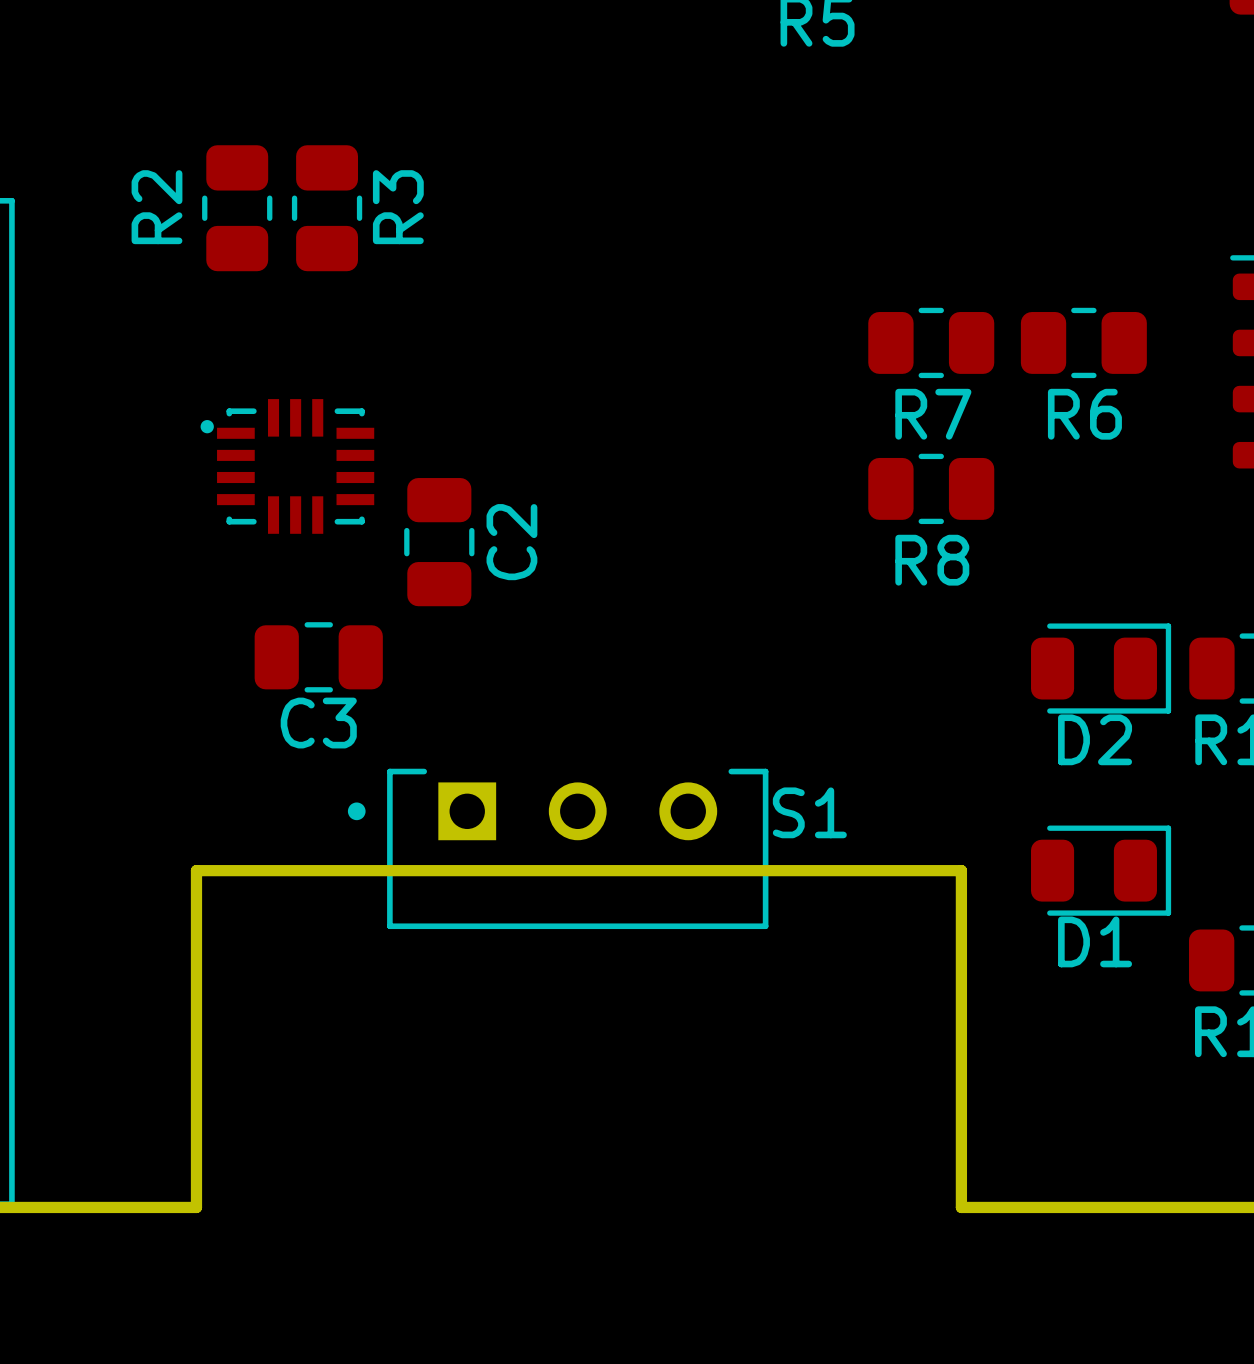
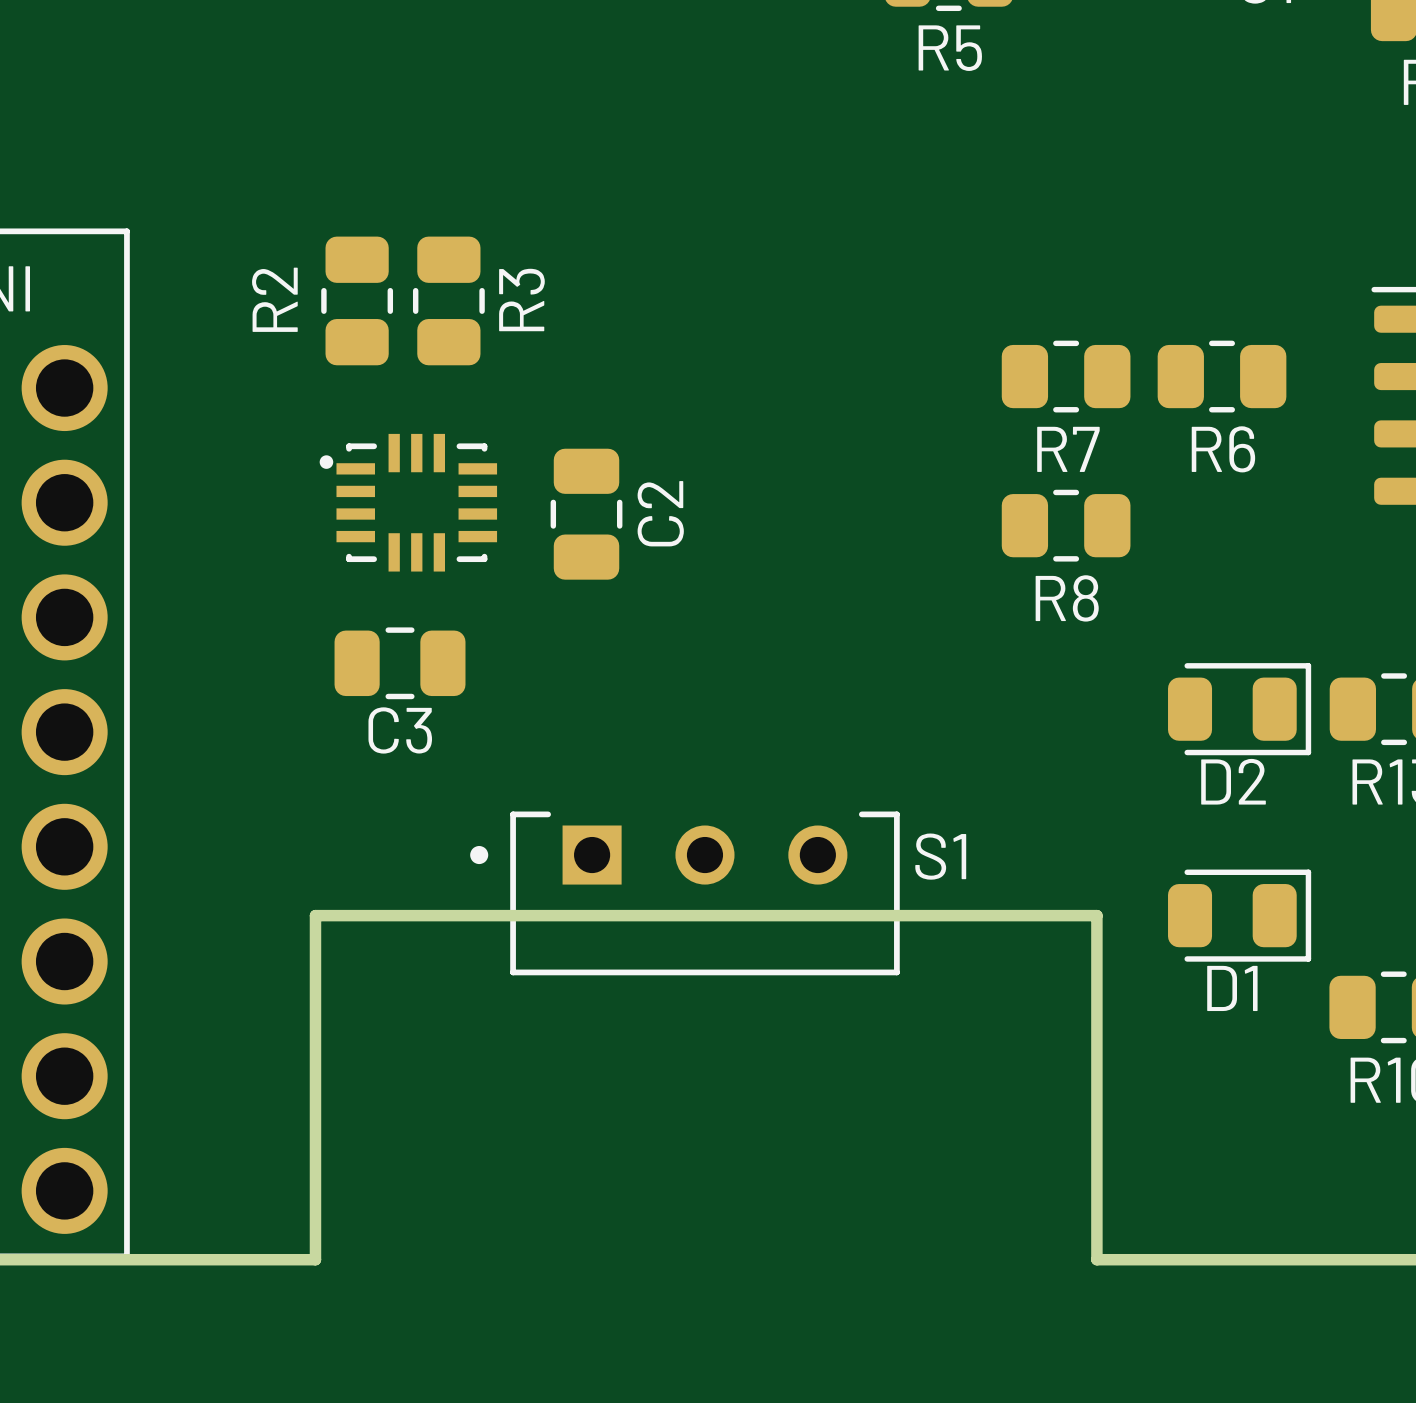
R2 position: (237, 208) -> (357, 300)
R3 position: (327, 208) -> (448, 300)
C2 position: (439, 542) -> (586, 514)
C3 position: (318, 657) -> (400, 663)

